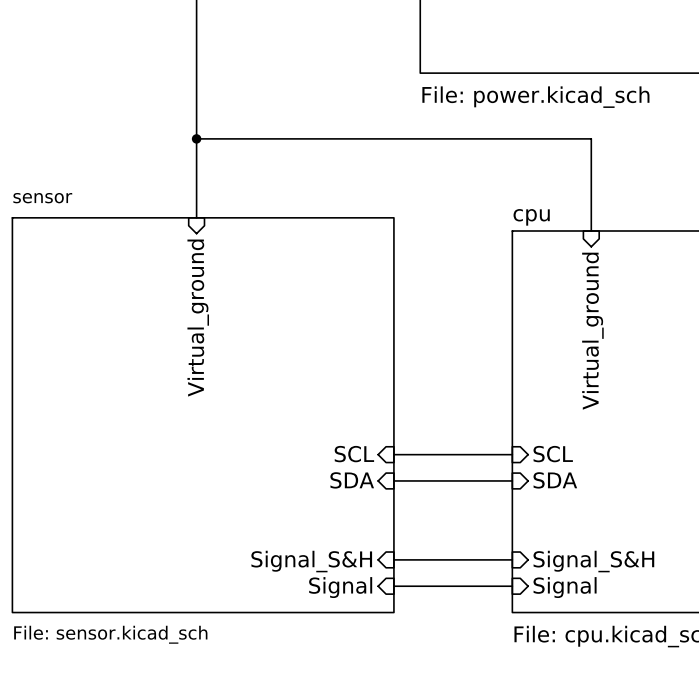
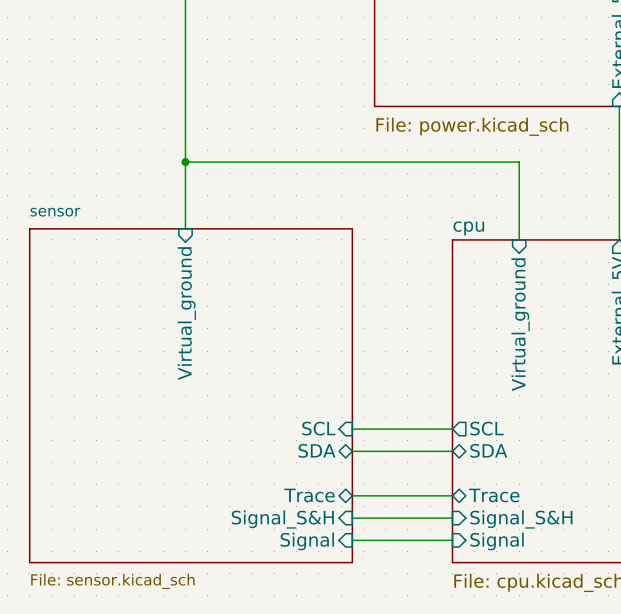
sheet pin shape: input (553, 454) -> output (487, 428)
sheet pin shape: input (352, 480) -> bidirectional (317, 450)
sheet pin shape: input (555, 480) -> bidirectional (488, 450)
sheet pin: none -> Trace (309, 495)
wire: none -> (352, 495) (452, 495)
sheet pin: none -> Trace (494, 495)

